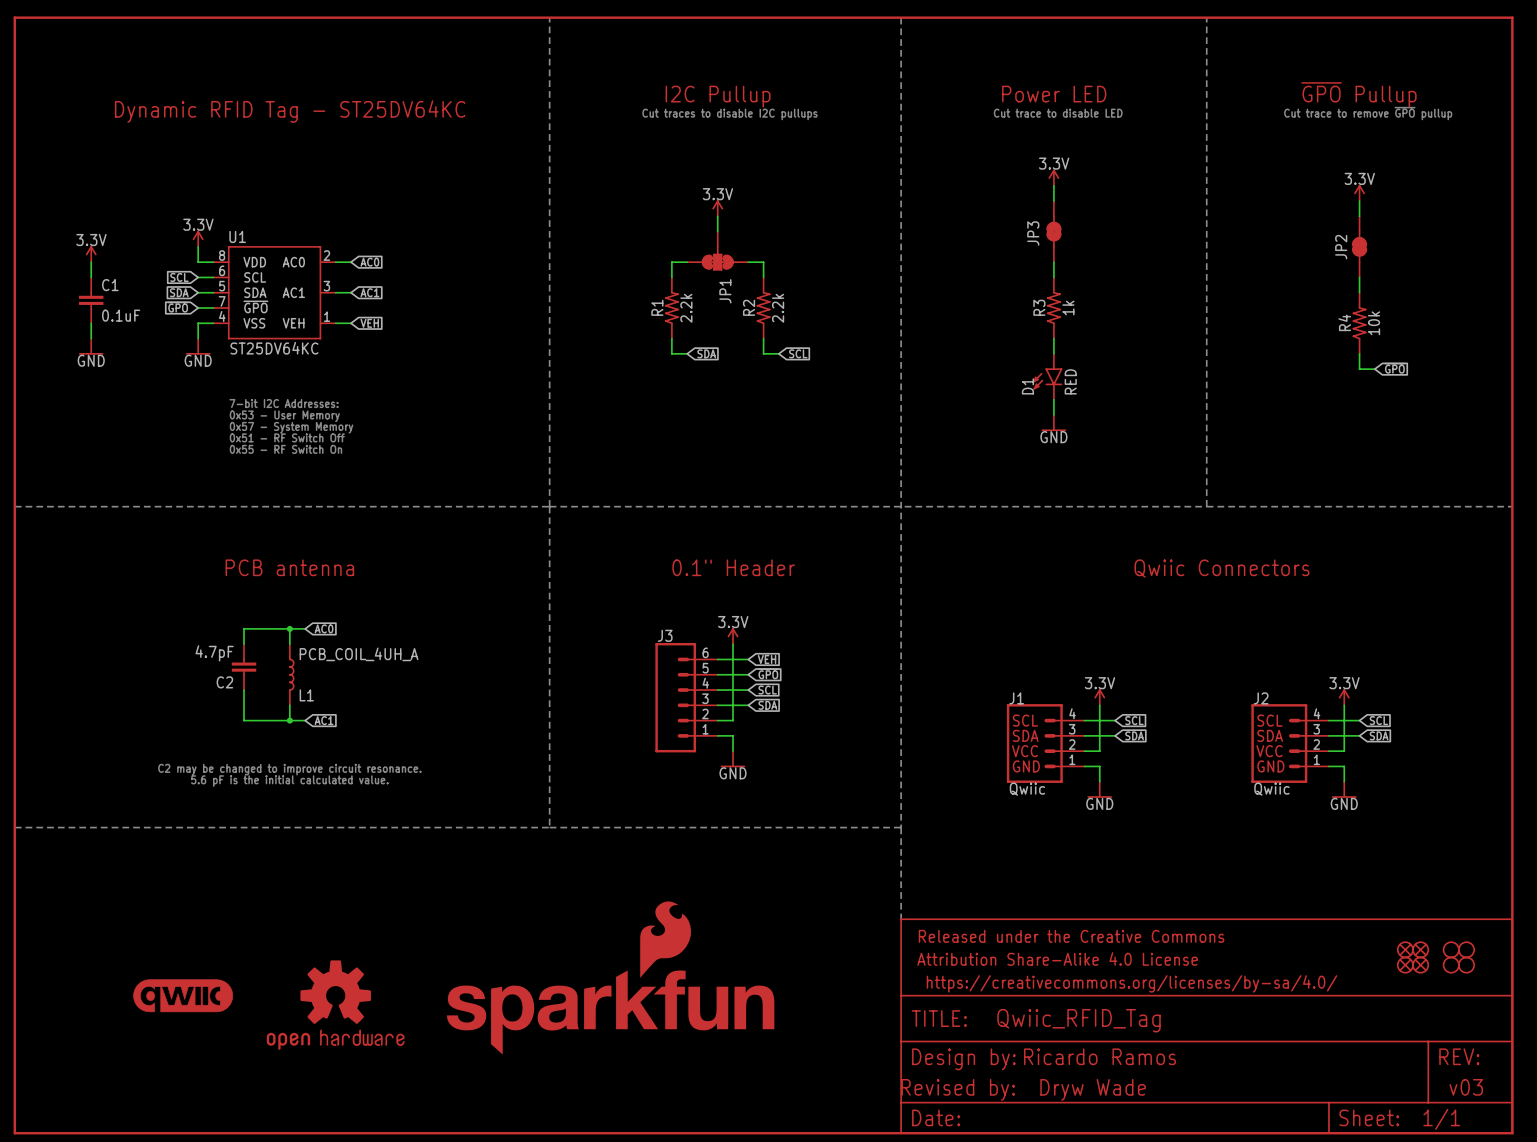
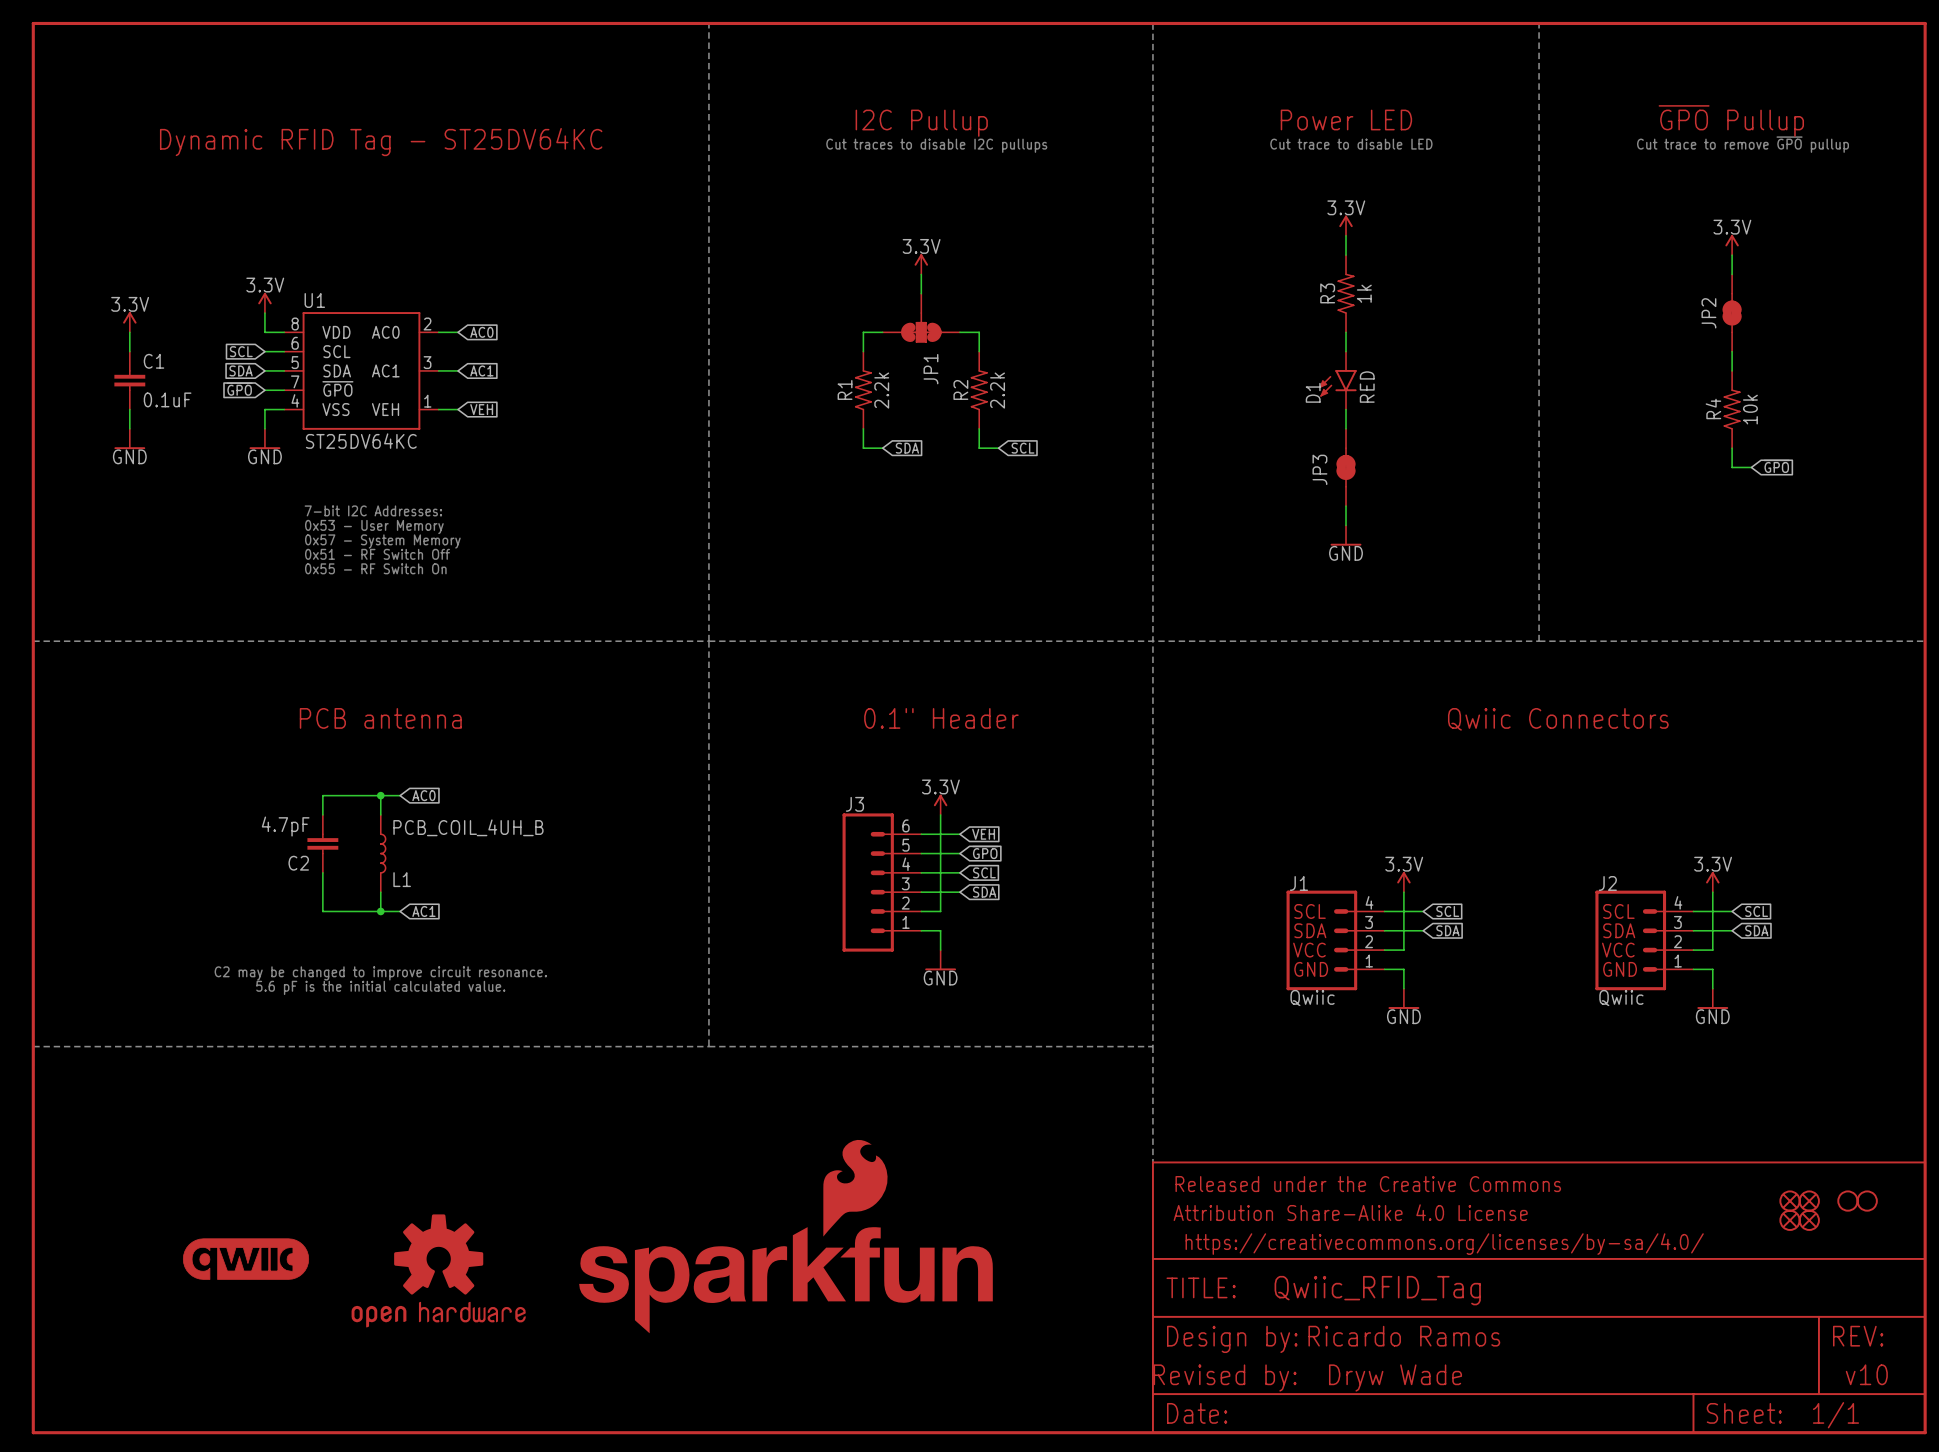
JP3 position: (1053, 231) -> (1346, 467)
R3 position: (1053, 308) -> (1346, 293)
D1 position: (1047, 376) -> (1337, 380)
L1 value: PCB_COIL_4UH_A (359, 654) -> PCB_COIL_4UH_B (468, 827)
part: (1451, 965) -> none
part: (1466, 965) -> none
text: v03 (1466, 1087) -> v10 (1866, 1374)

